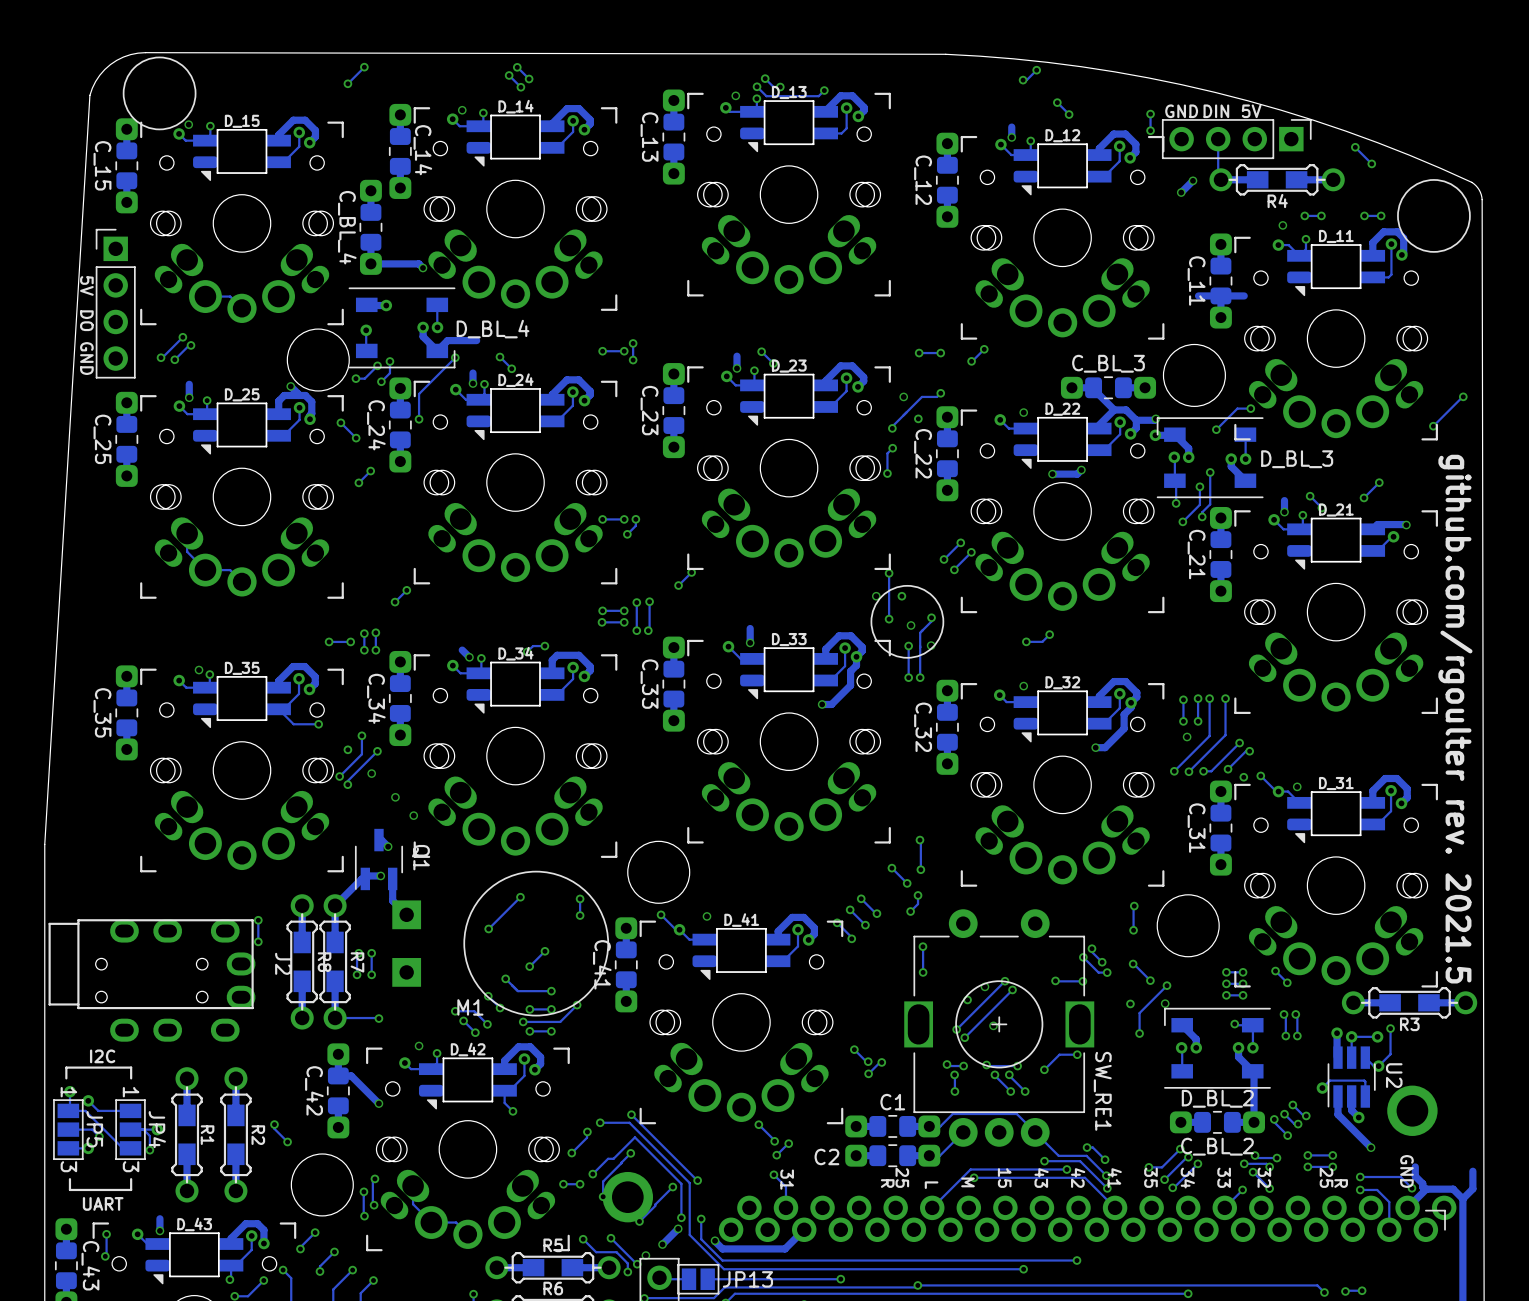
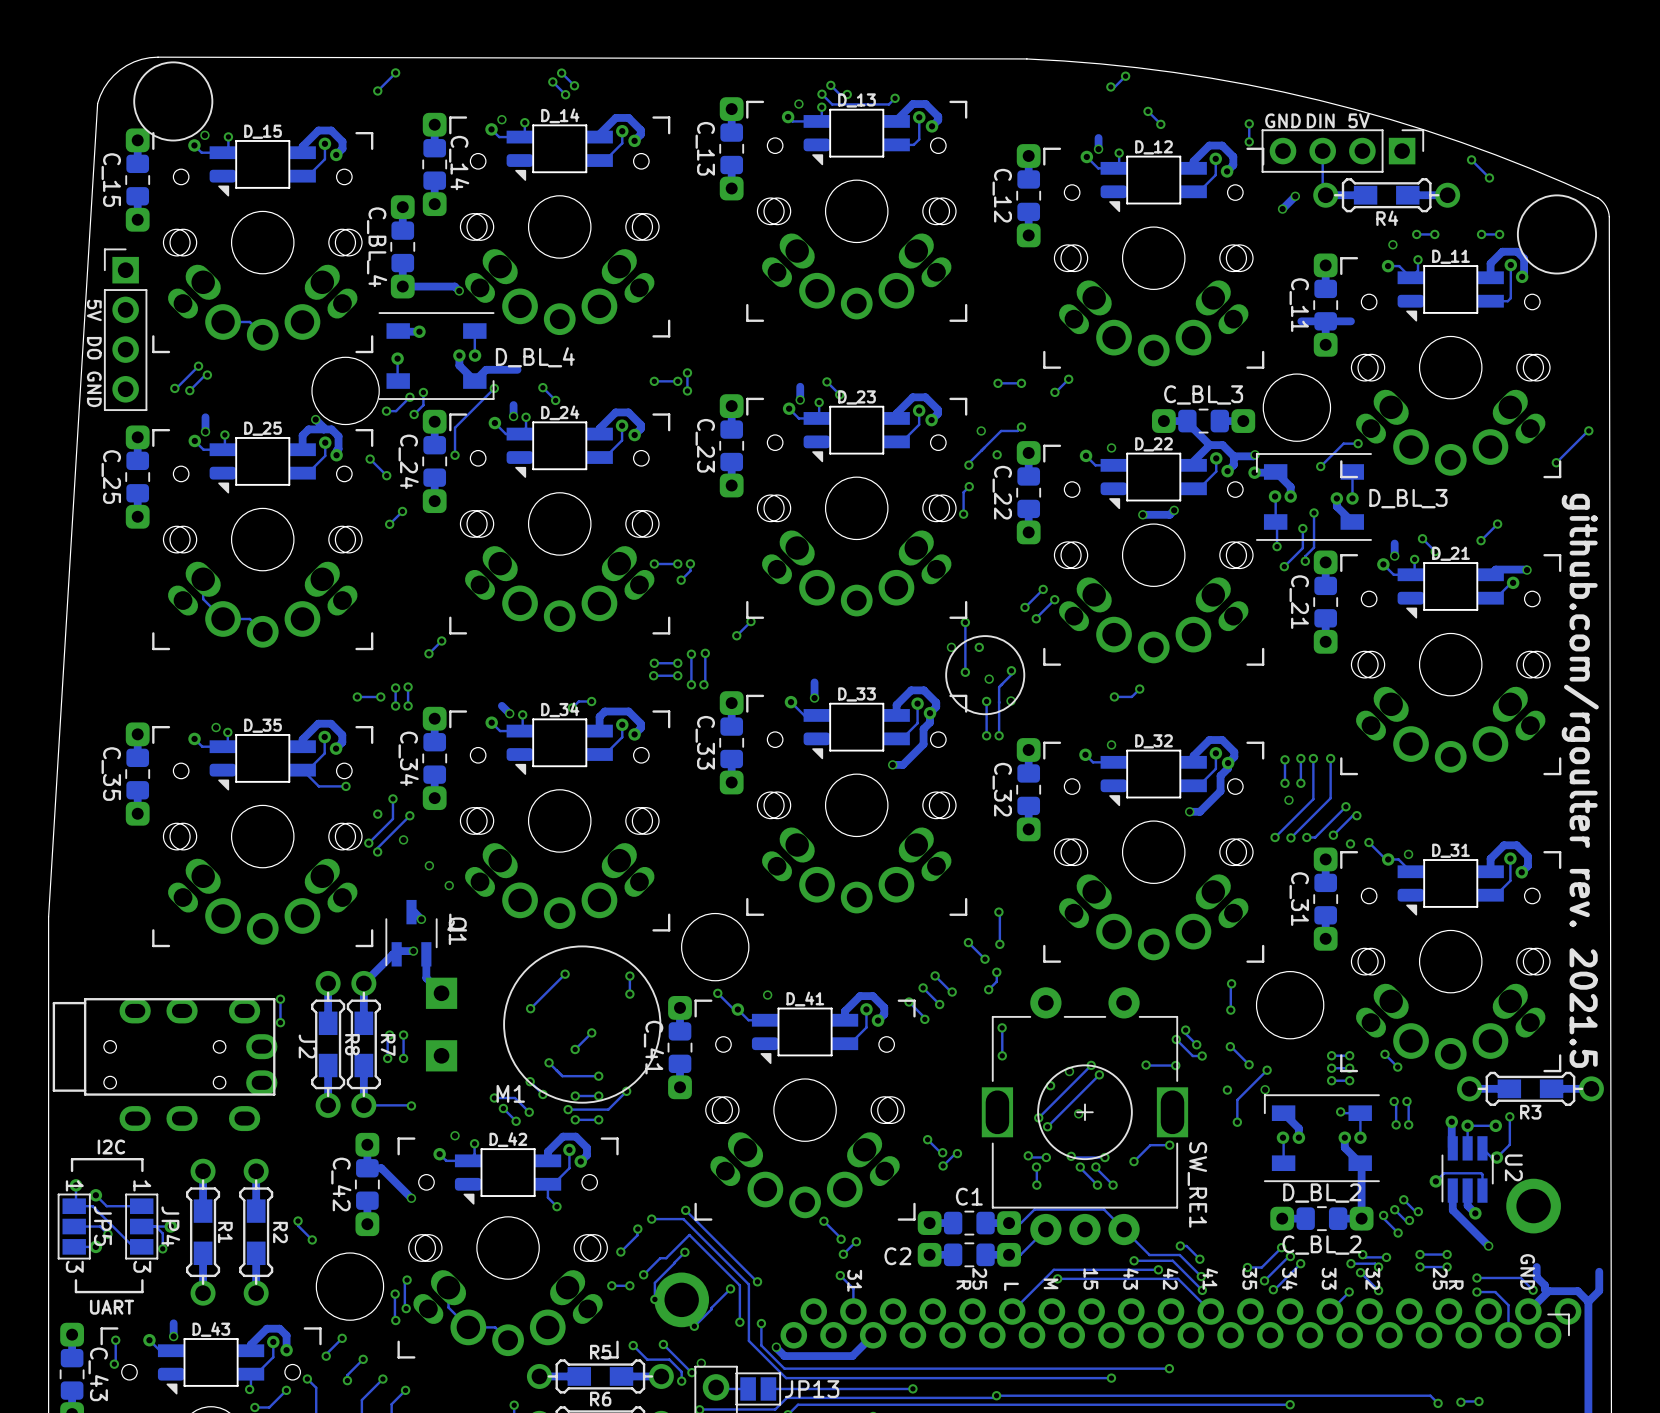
track: (678, 1228) (662, 1244) -> none
via: (678, 1228) -> none
via: (662, 1244) -> none

